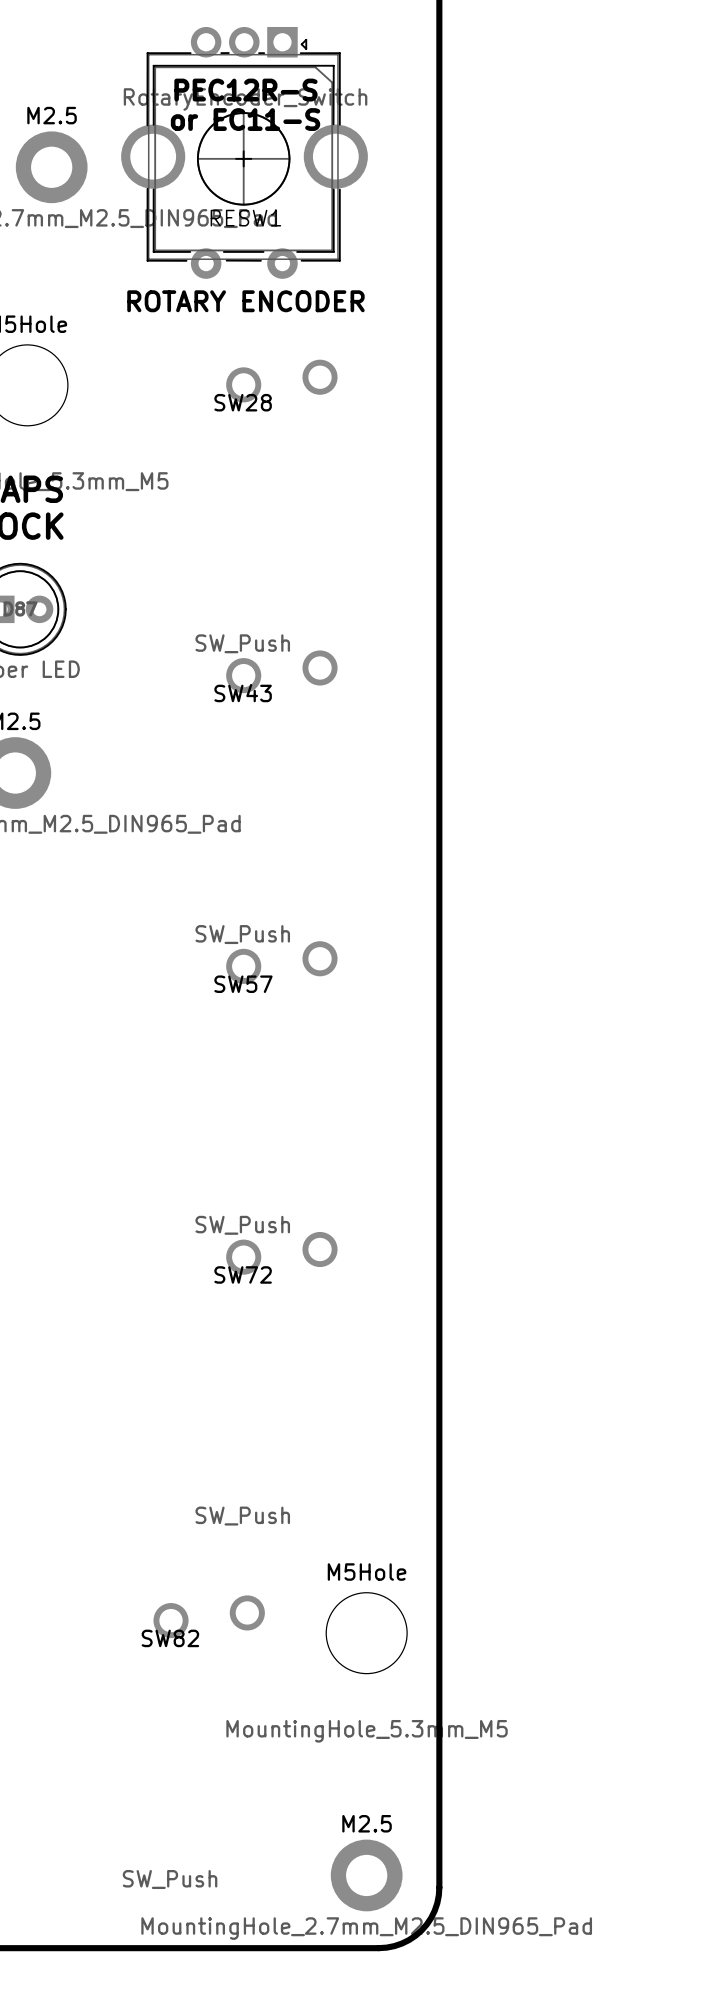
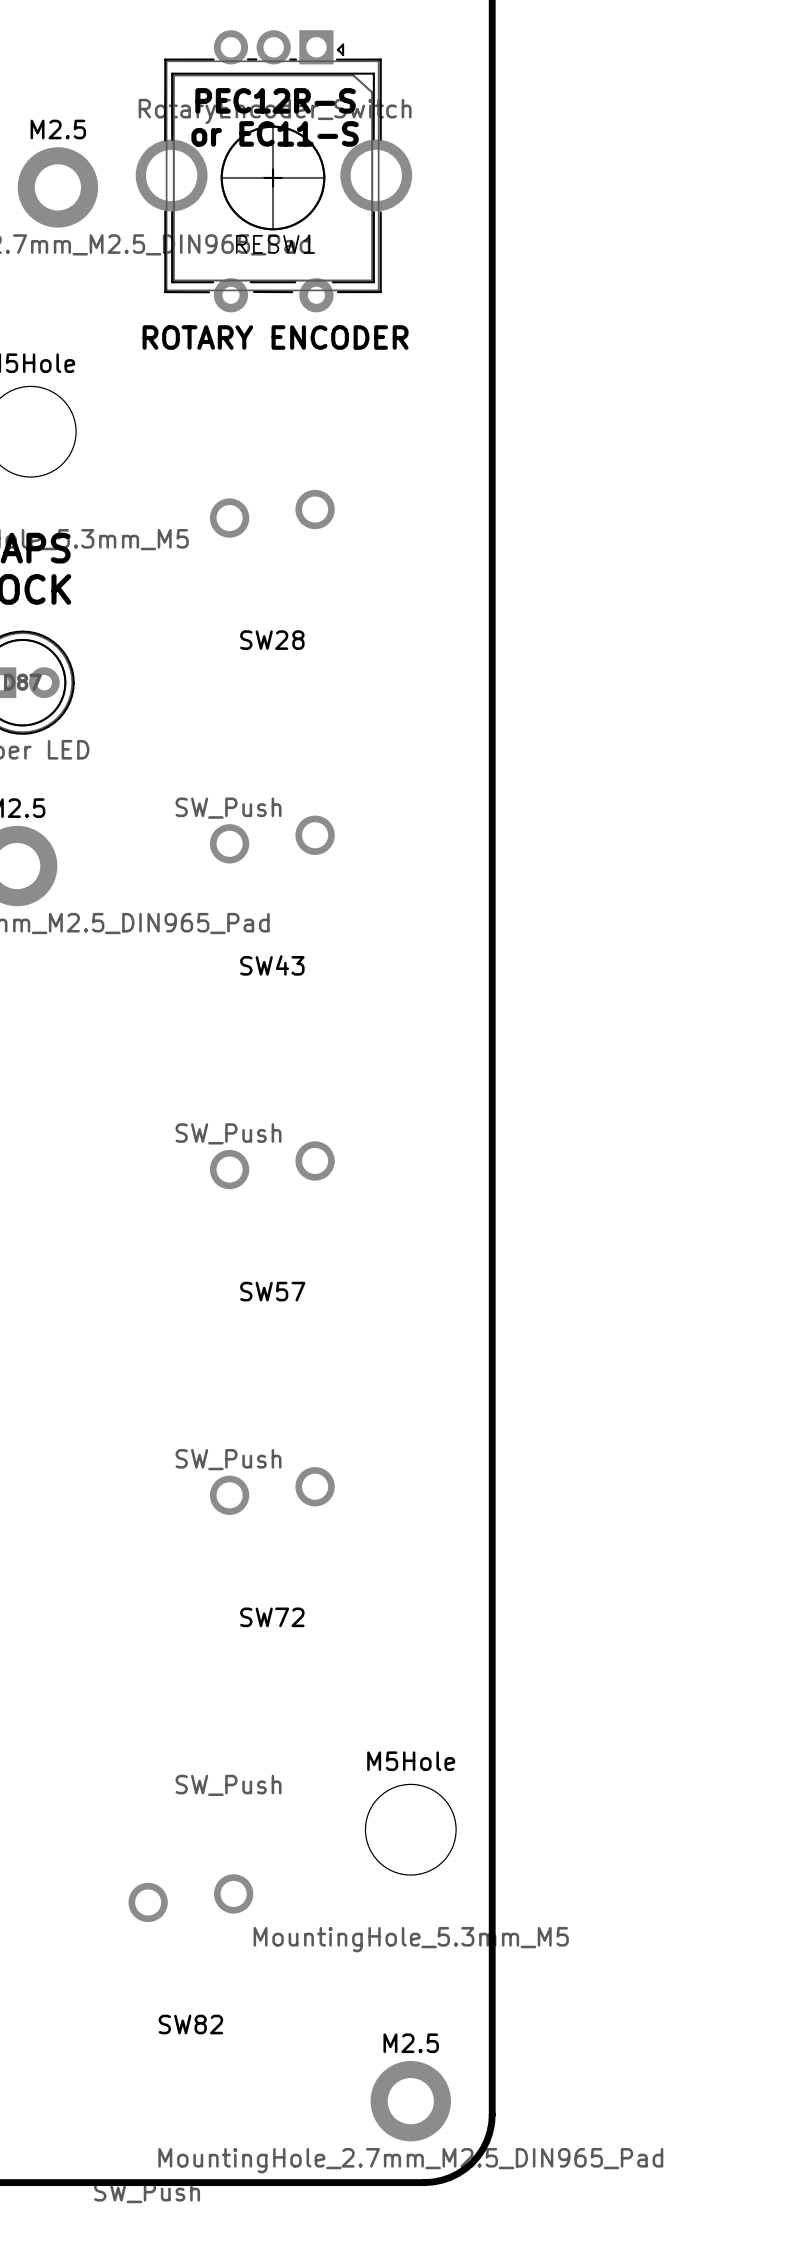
SW28 position: (281, 381) -> (272, 513)
SW28 name position: SW28 (243, 402) -> SW28 (272, 640)
SW43 position: (281, 671) -> (272, 839)
SW43 name position: SW43 (243, 693) -> SW43 (272, 965)
SW57 position: (281, 962) -> (272, 1165)
SW57 name position: SW57 (243, 984) -> SW57 (272, 1291)
SW72 position: (281, 1253) -> (272, 1491)
SW72 name position: SW72 (243, 1274) -> SW72 (272, 1617)
SW82 position: (209, 1616) -> (190, 1898)
SW82 name position: SW82 (170, 1638) -> SW82 (190, 2024)

